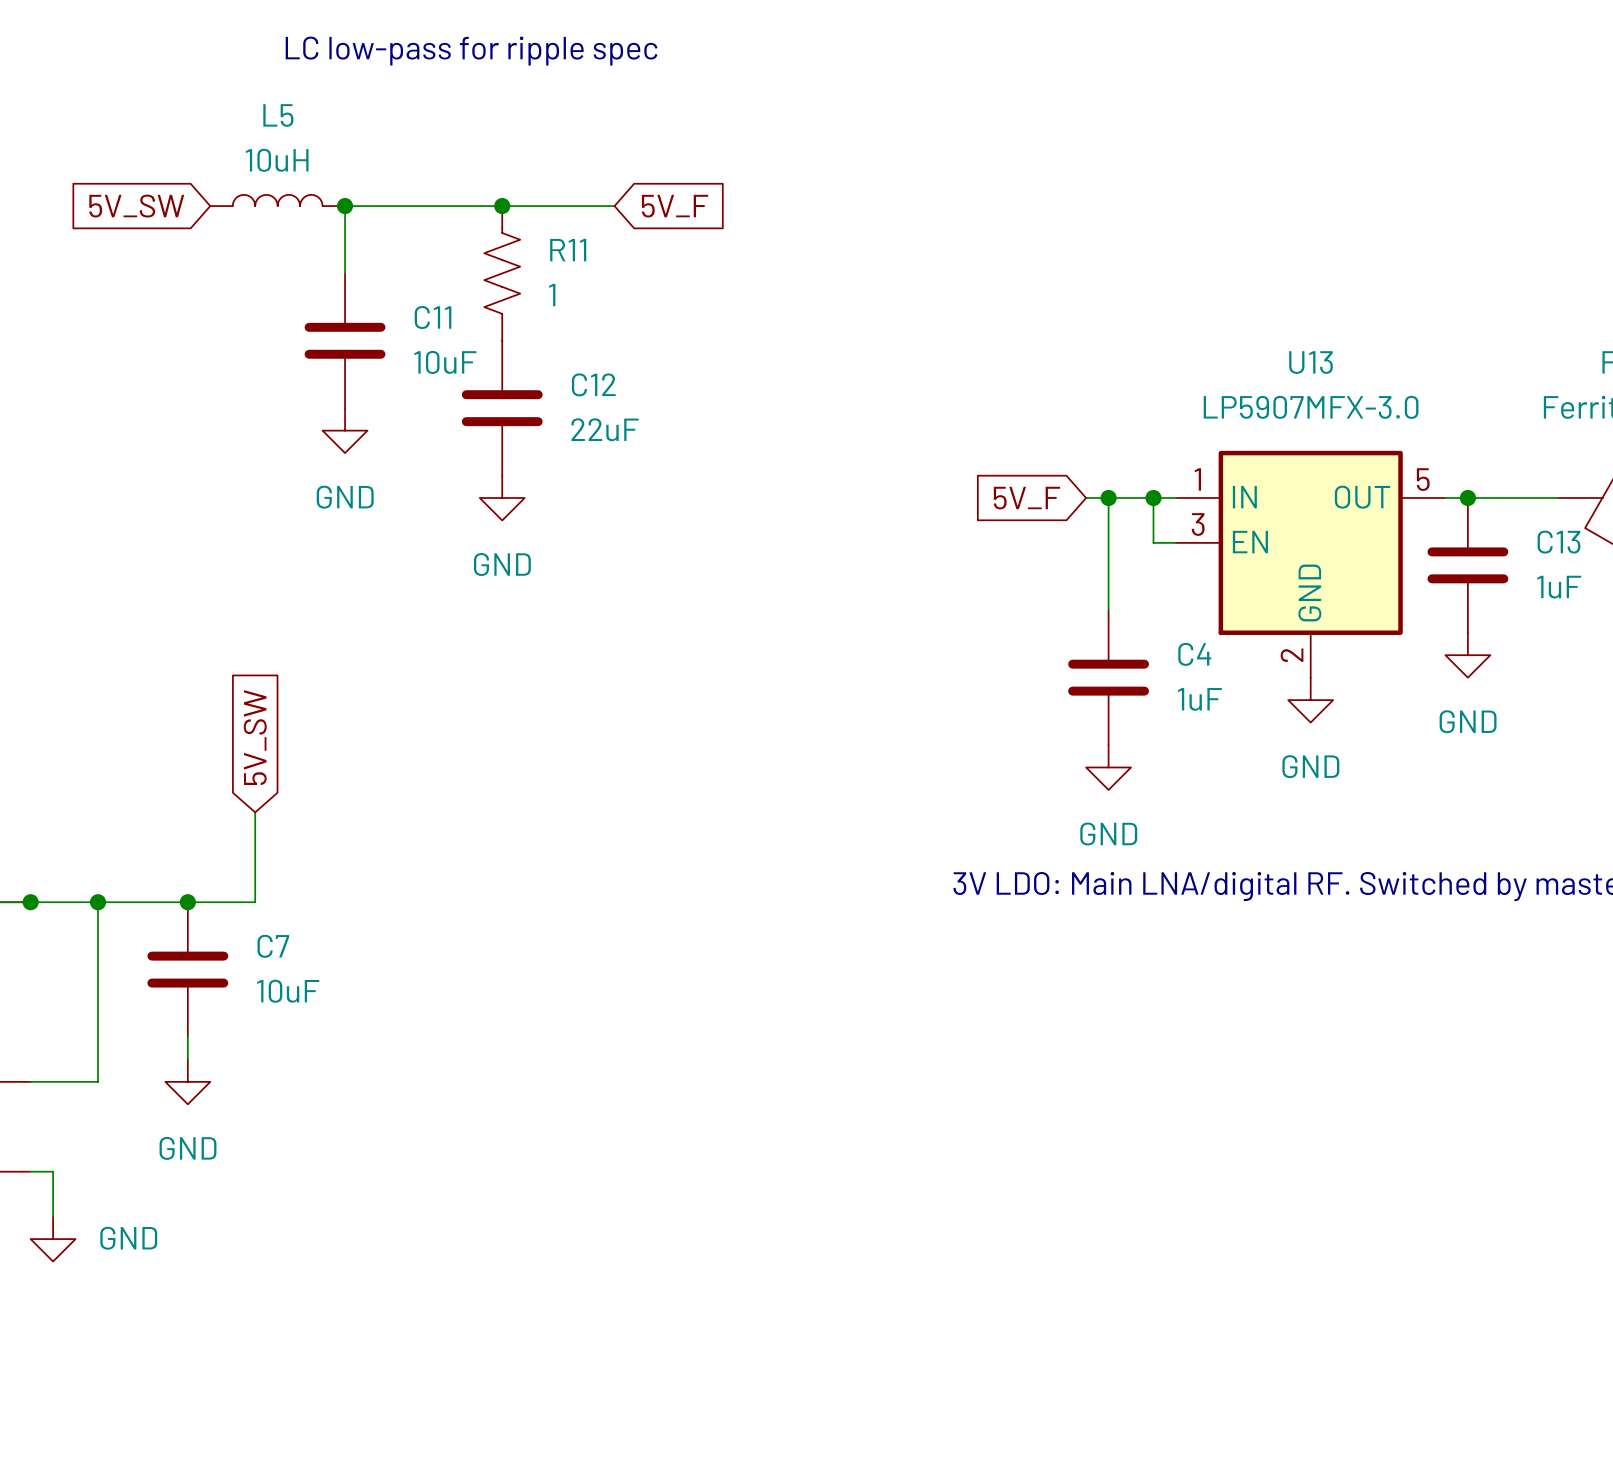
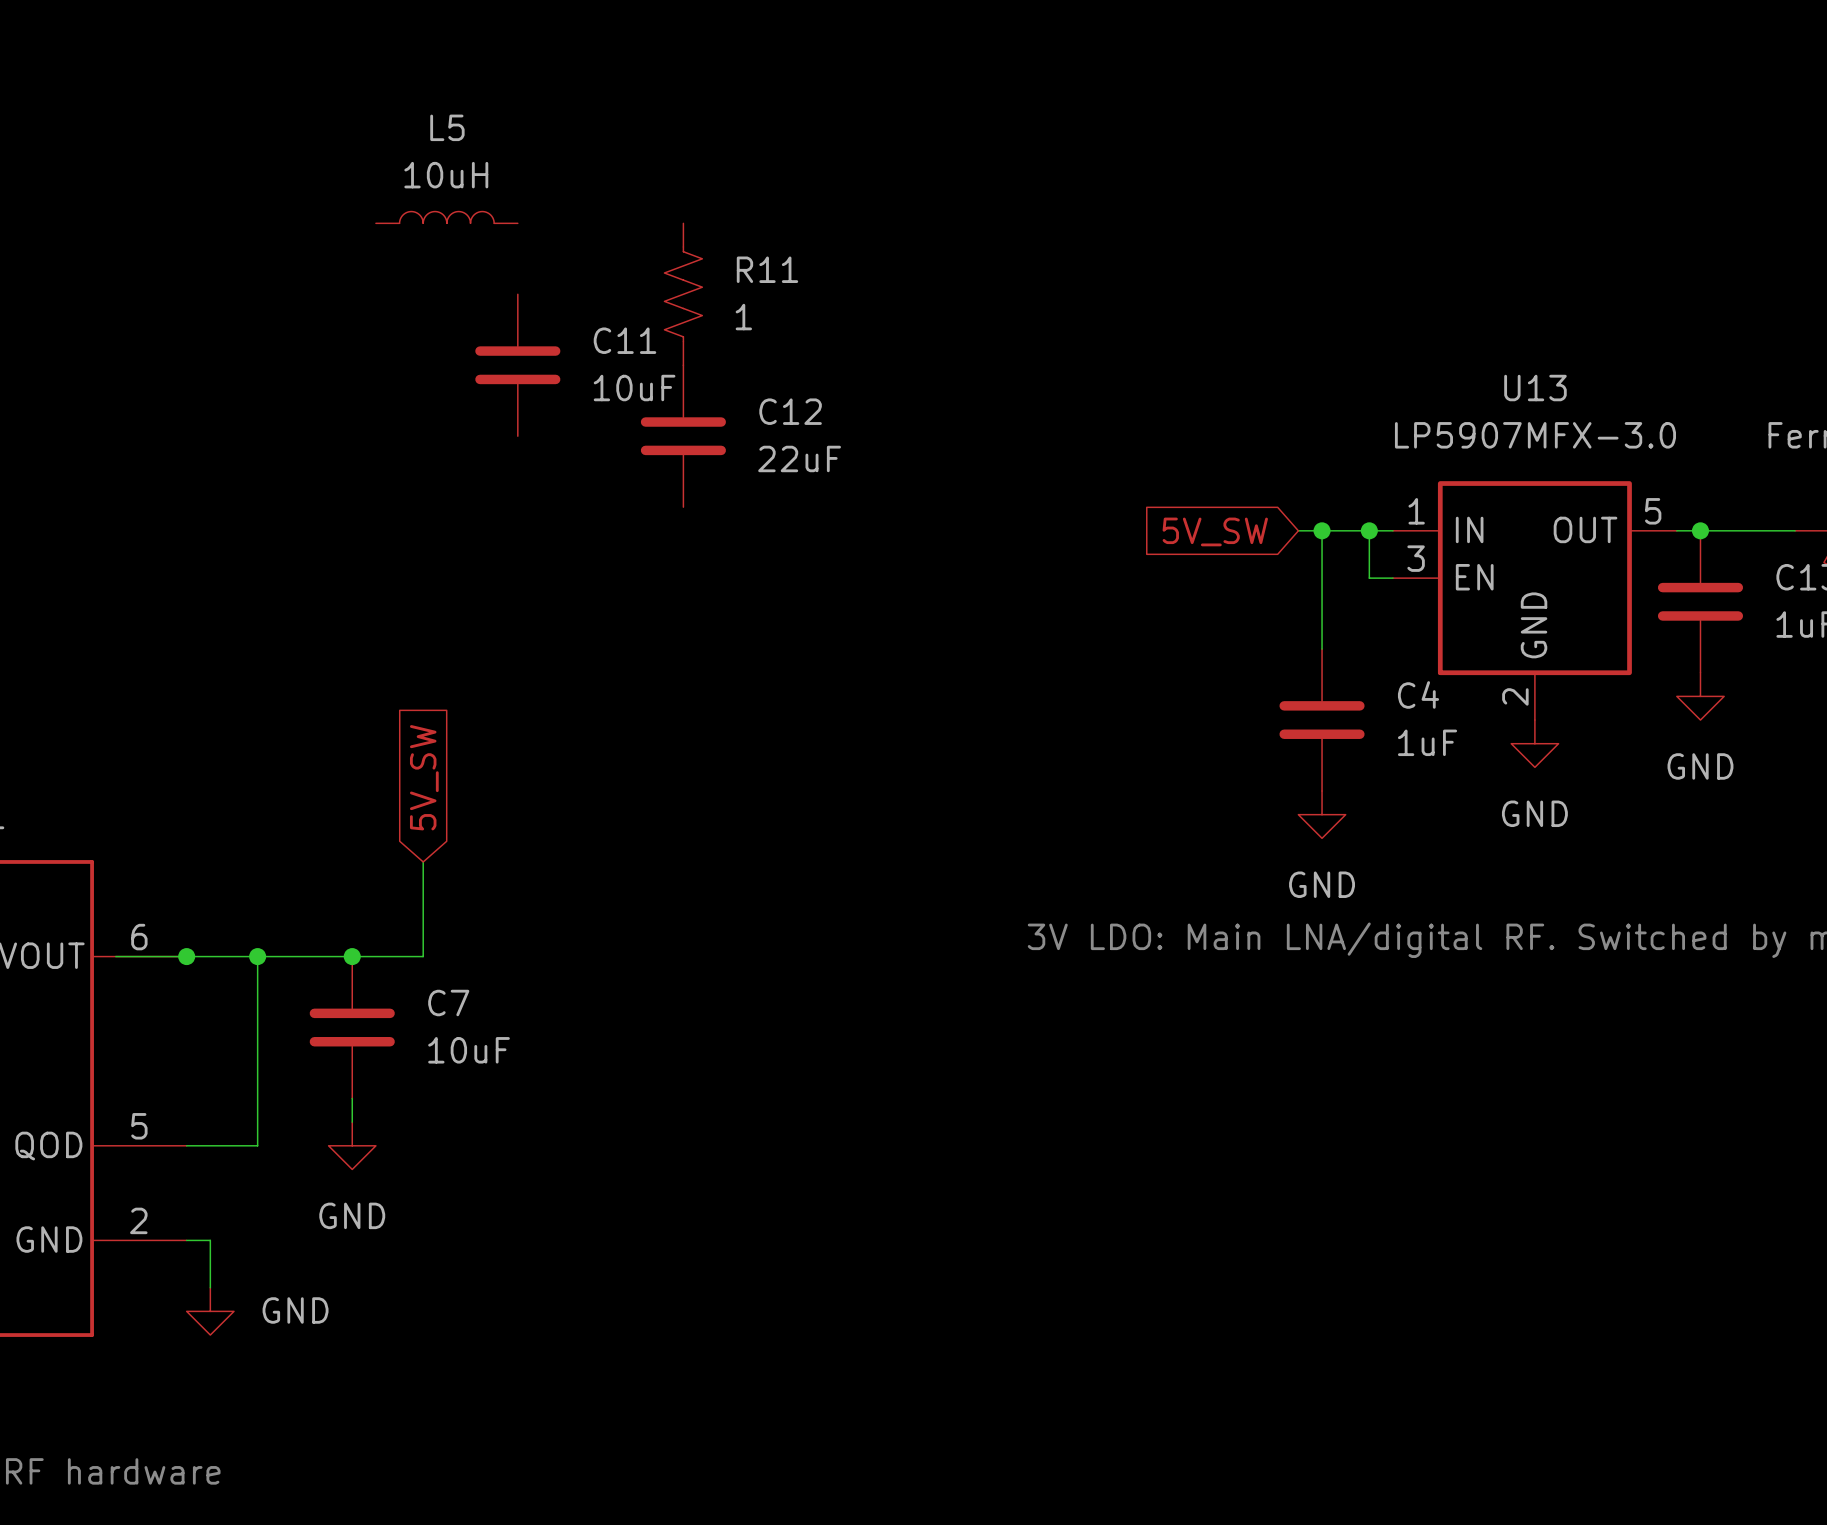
text: LC low-pass for ripple spec (471, 51) -> none
global label: 5V_SW (136, 206) -> none
junction: (345, 206) -> none
junction: (502, 206) -> none
wire: (614, 206) (345, 206) (345, 273) -> none
global label: 5V_F (675, 206) -> none
power symbol: GND (345, 430) -> none
power symbol: GND (502, 498) -> none
global label: 5V_F (1027, 498) -> 5V_SW (1215, 531)

